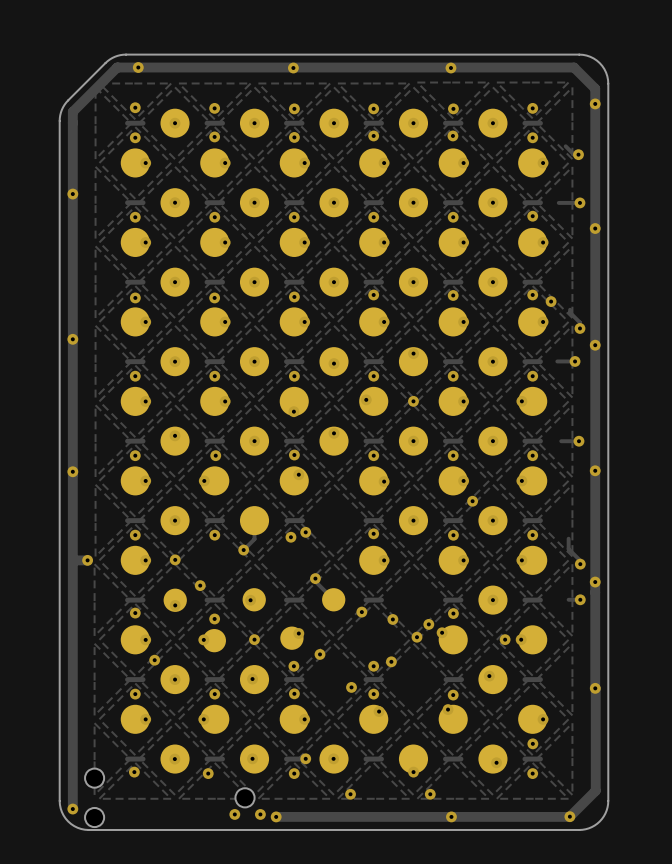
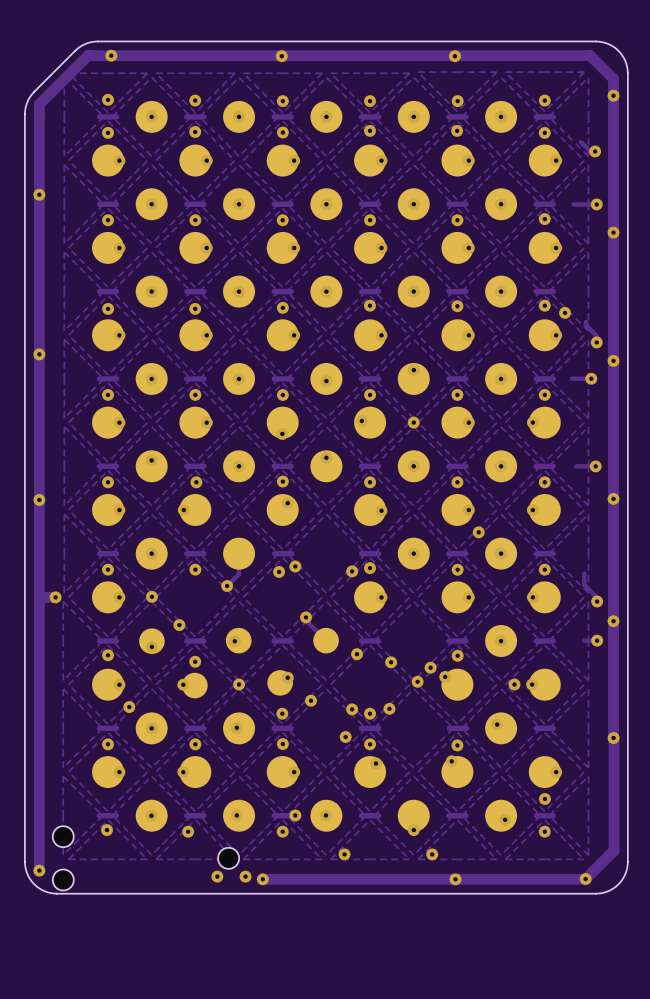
via: none -> (352, 571)
via: none -> (352, 709)

